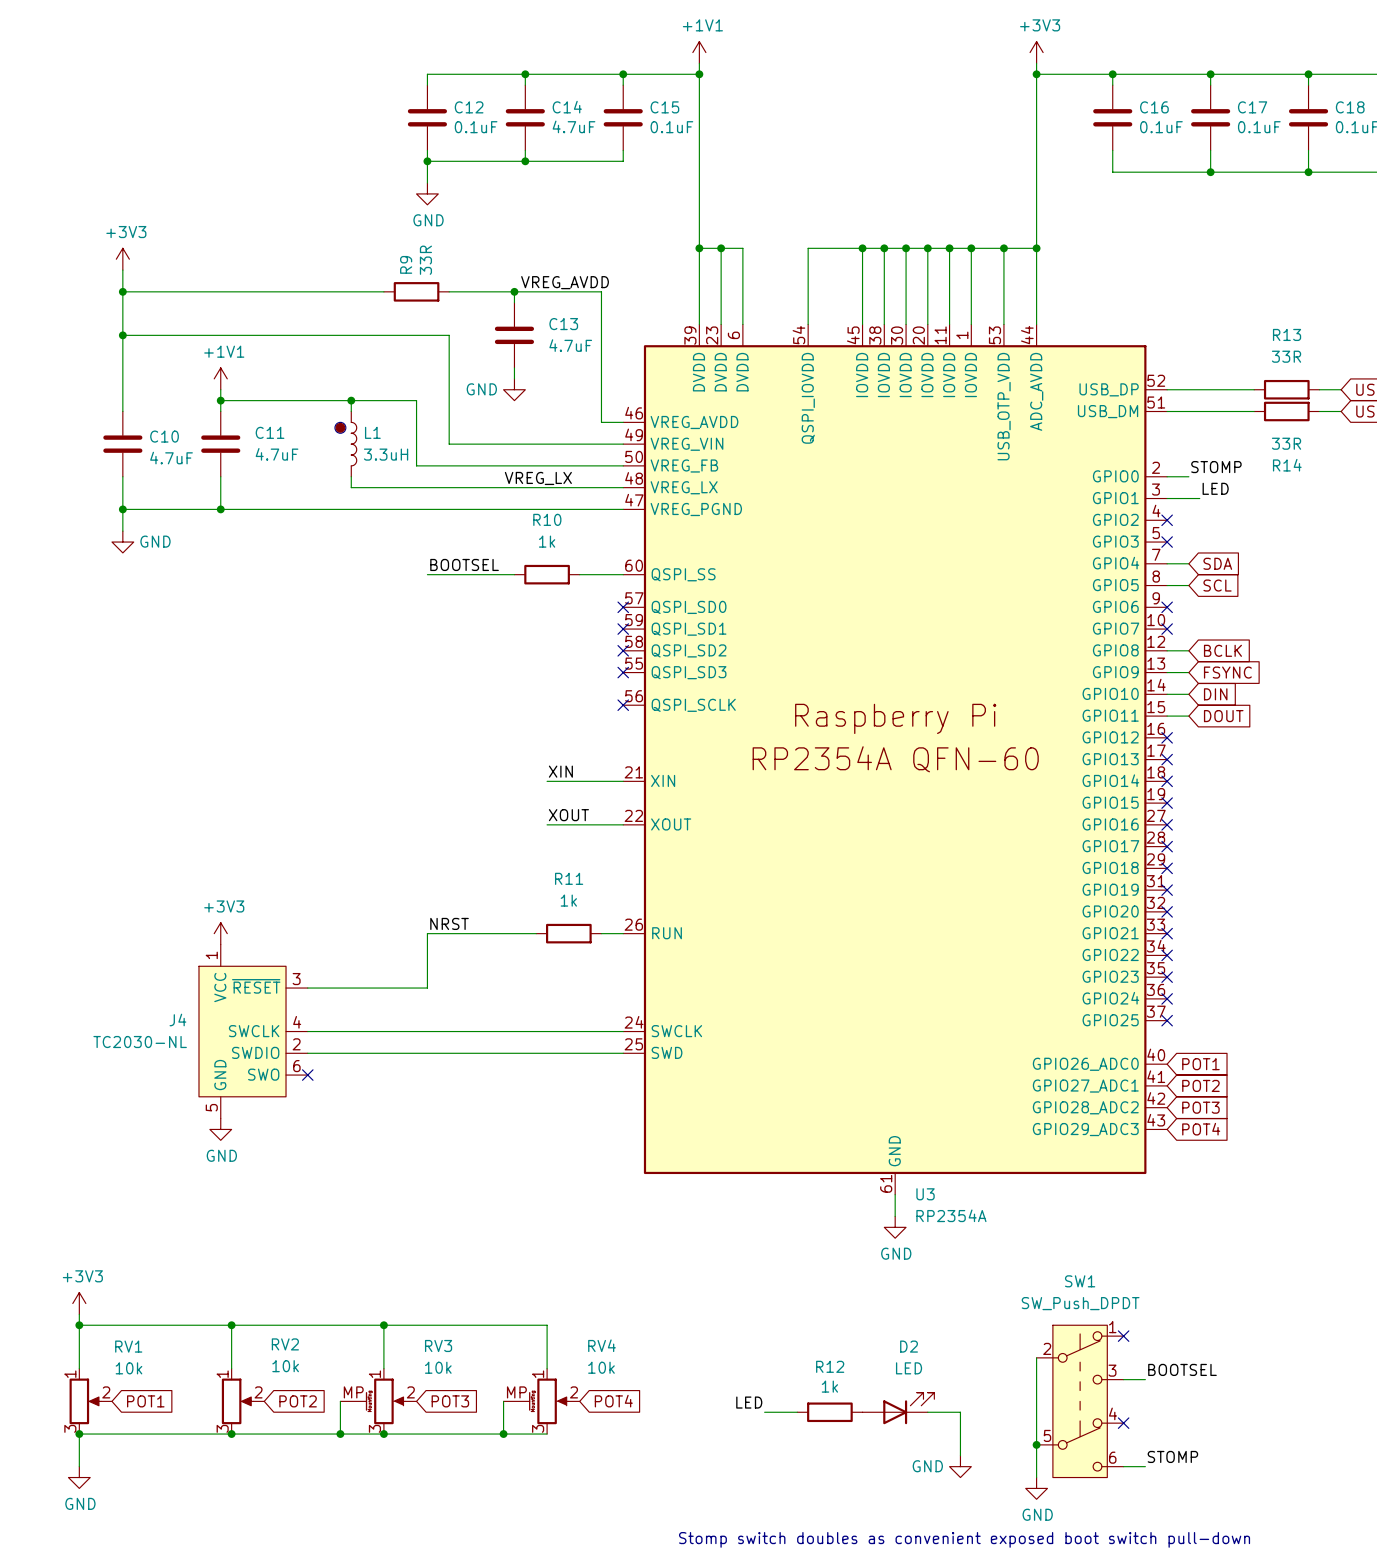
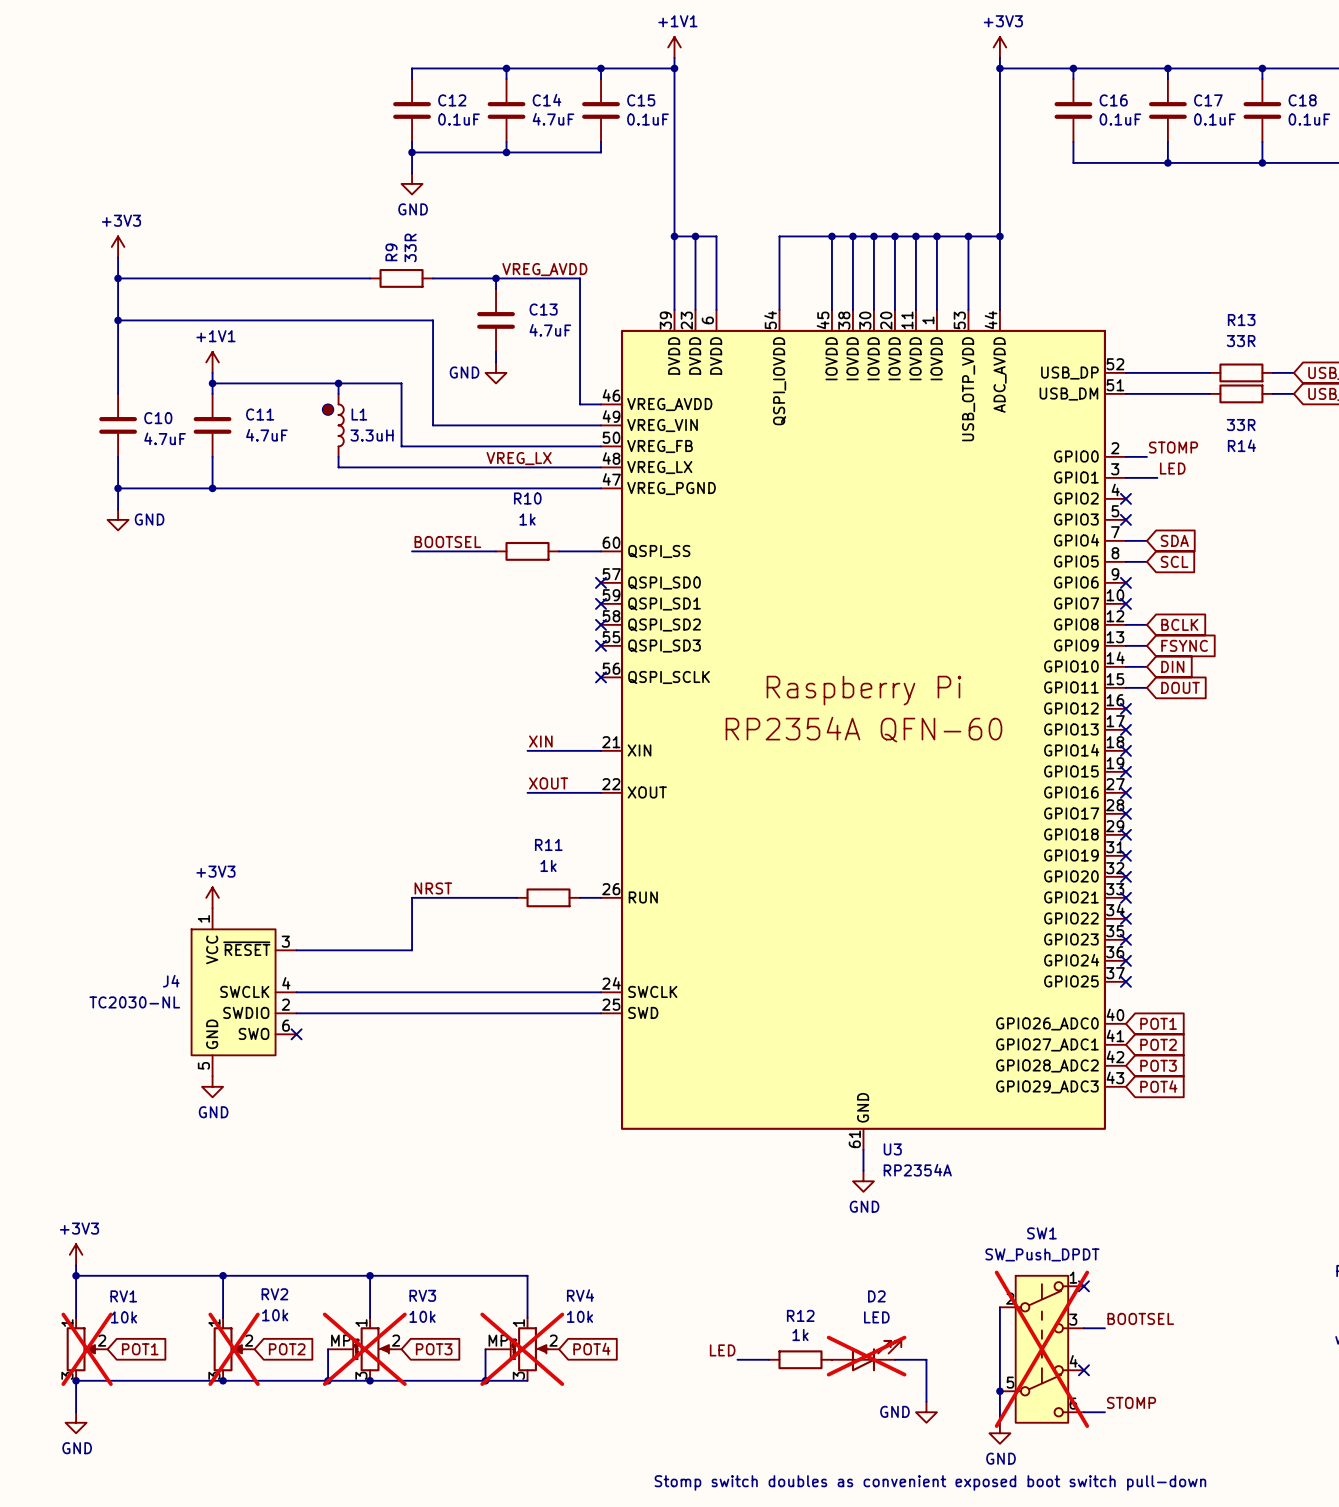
RV1 do-not-place cross: none -> (87, 1349)
RV2 do-not-place cross: none -> (234, 1349)
RV3 do-not-place cross: none -> (364, 1349)
RV4 do-not-place cross: none -> (522, 1349)
SW1 do-not-place cross: none -> (1041, 1349)
D2 do-not-place cross: none -> (866, 1356)

